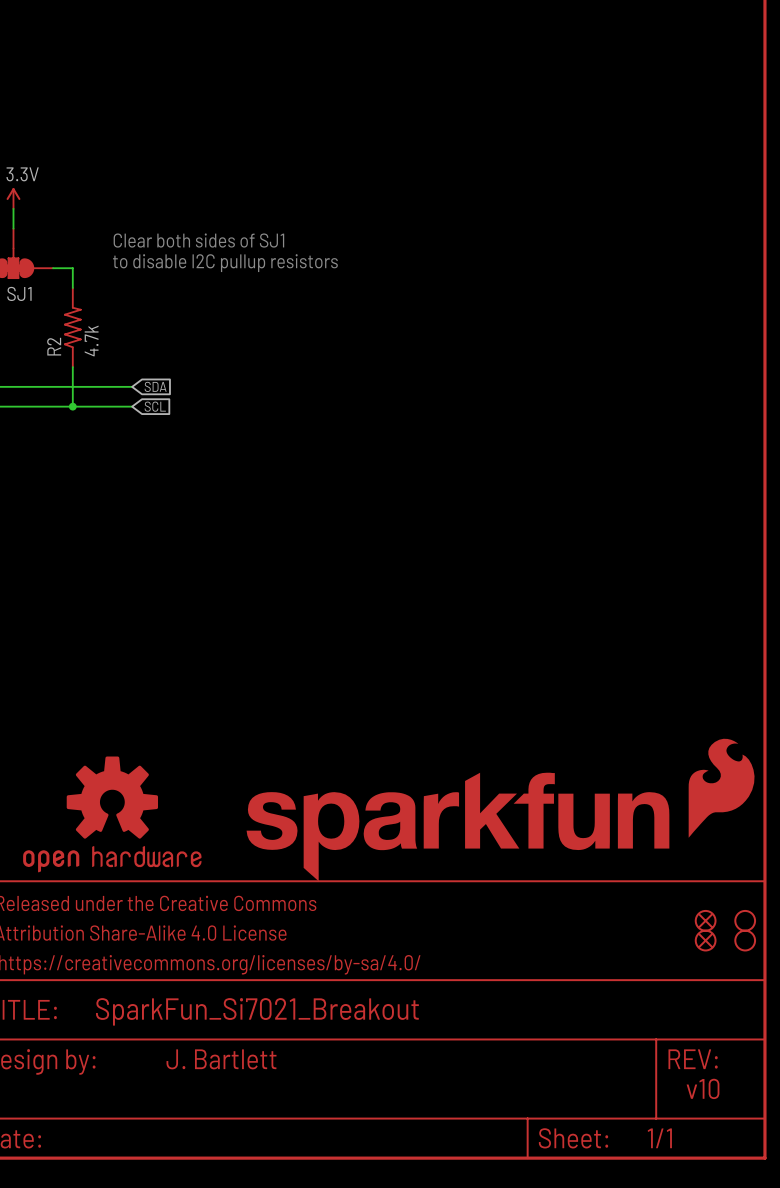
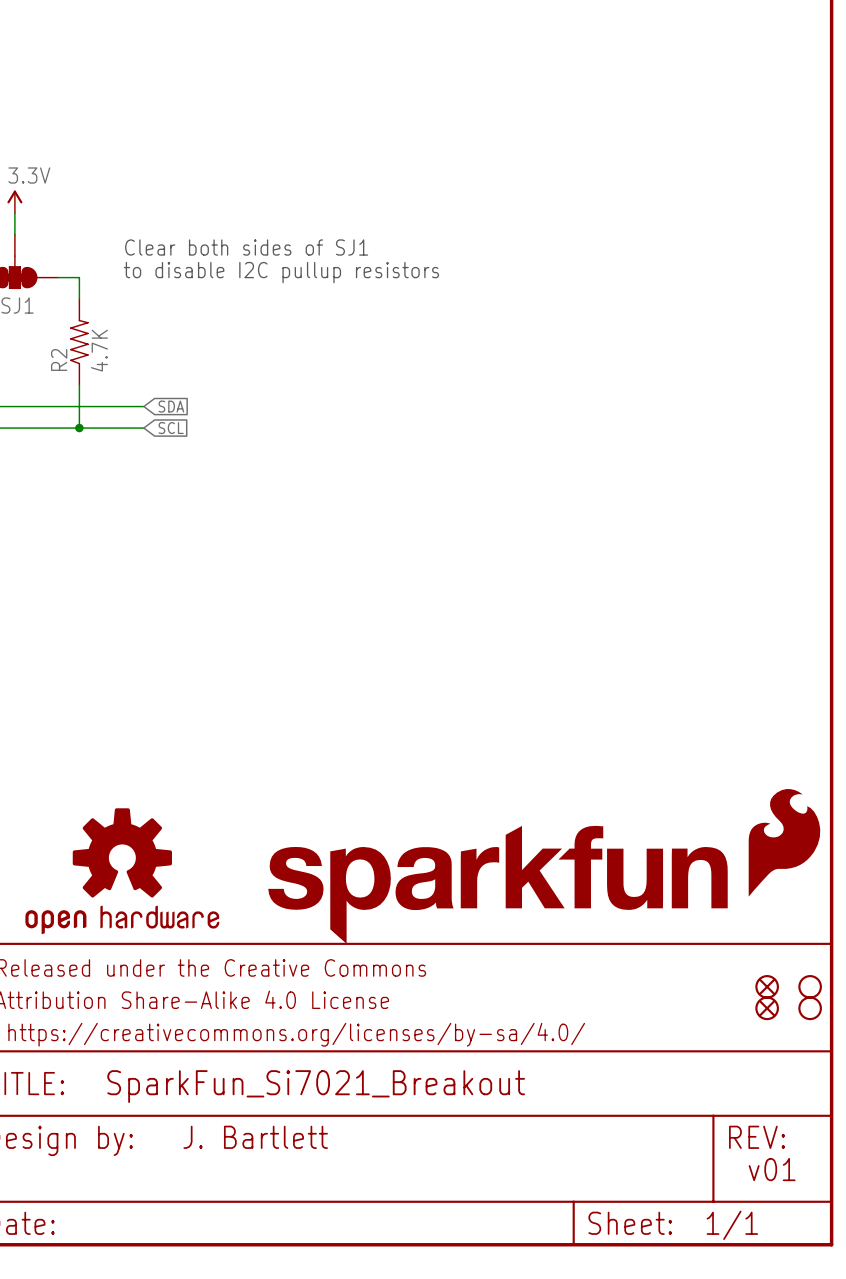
R2 value: 4.7k (91, 340) -> 4.7K (99, 350)
text: v10 (703, 1088) -> v01 (772, 1169)

